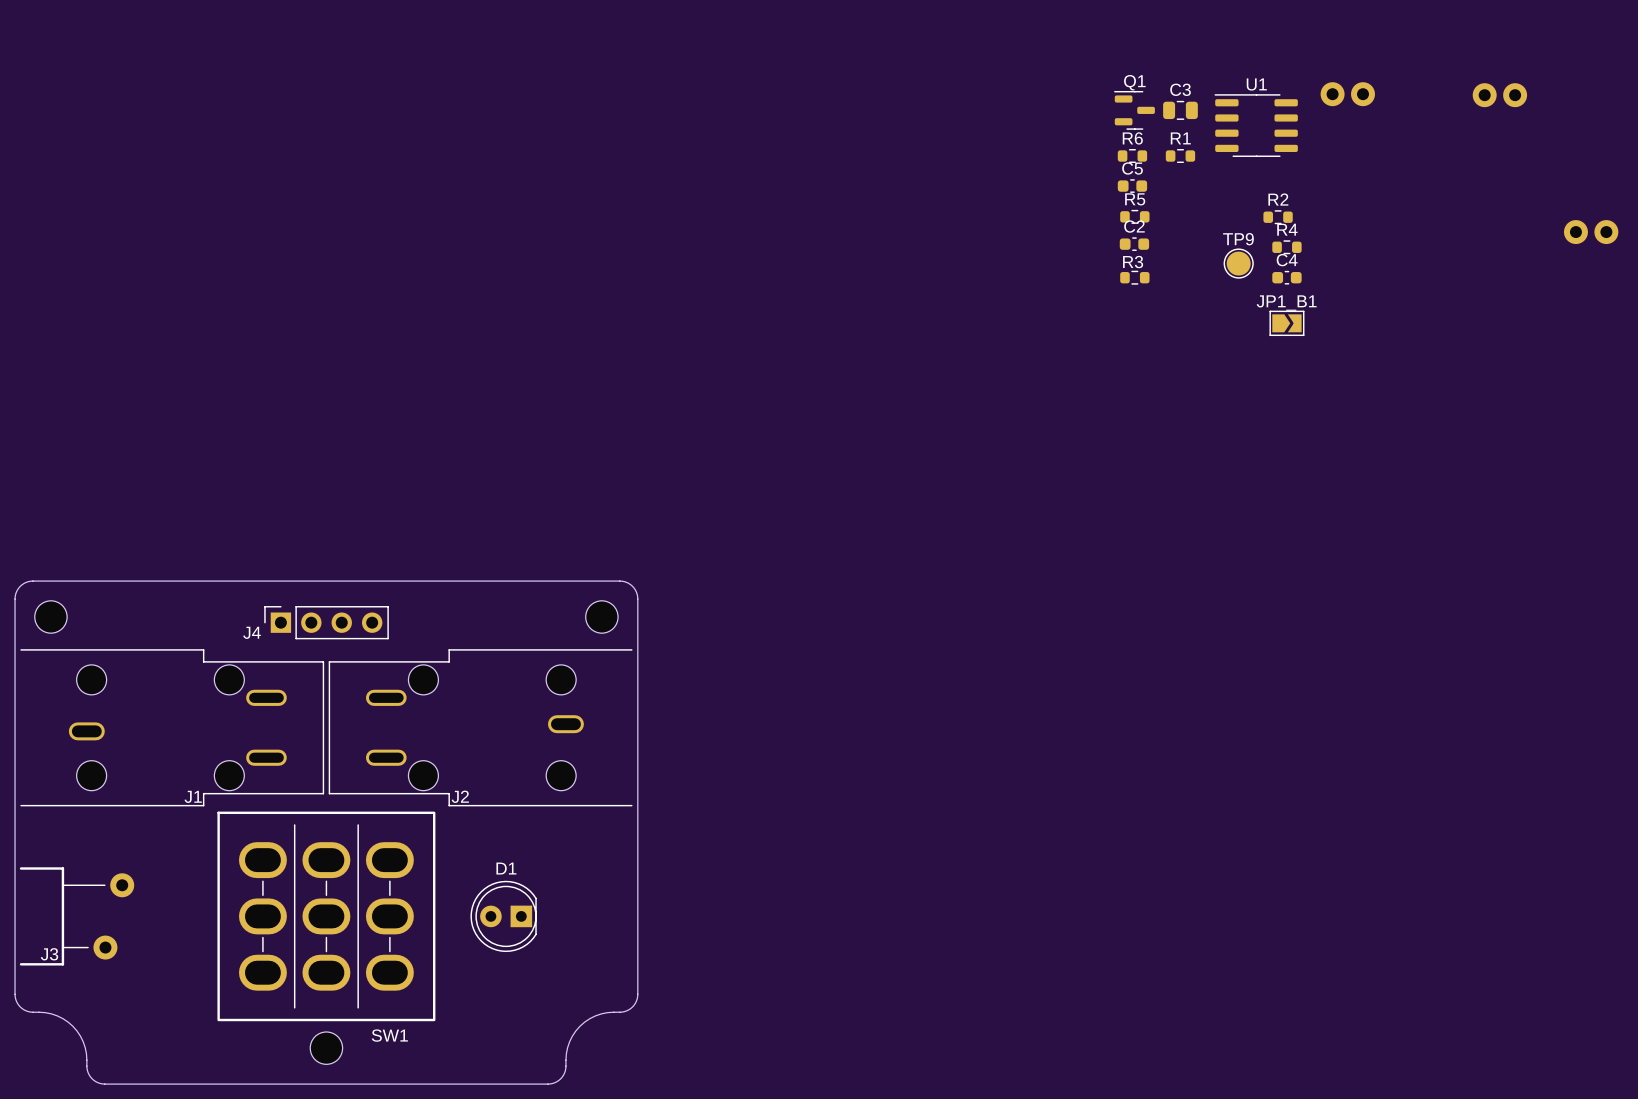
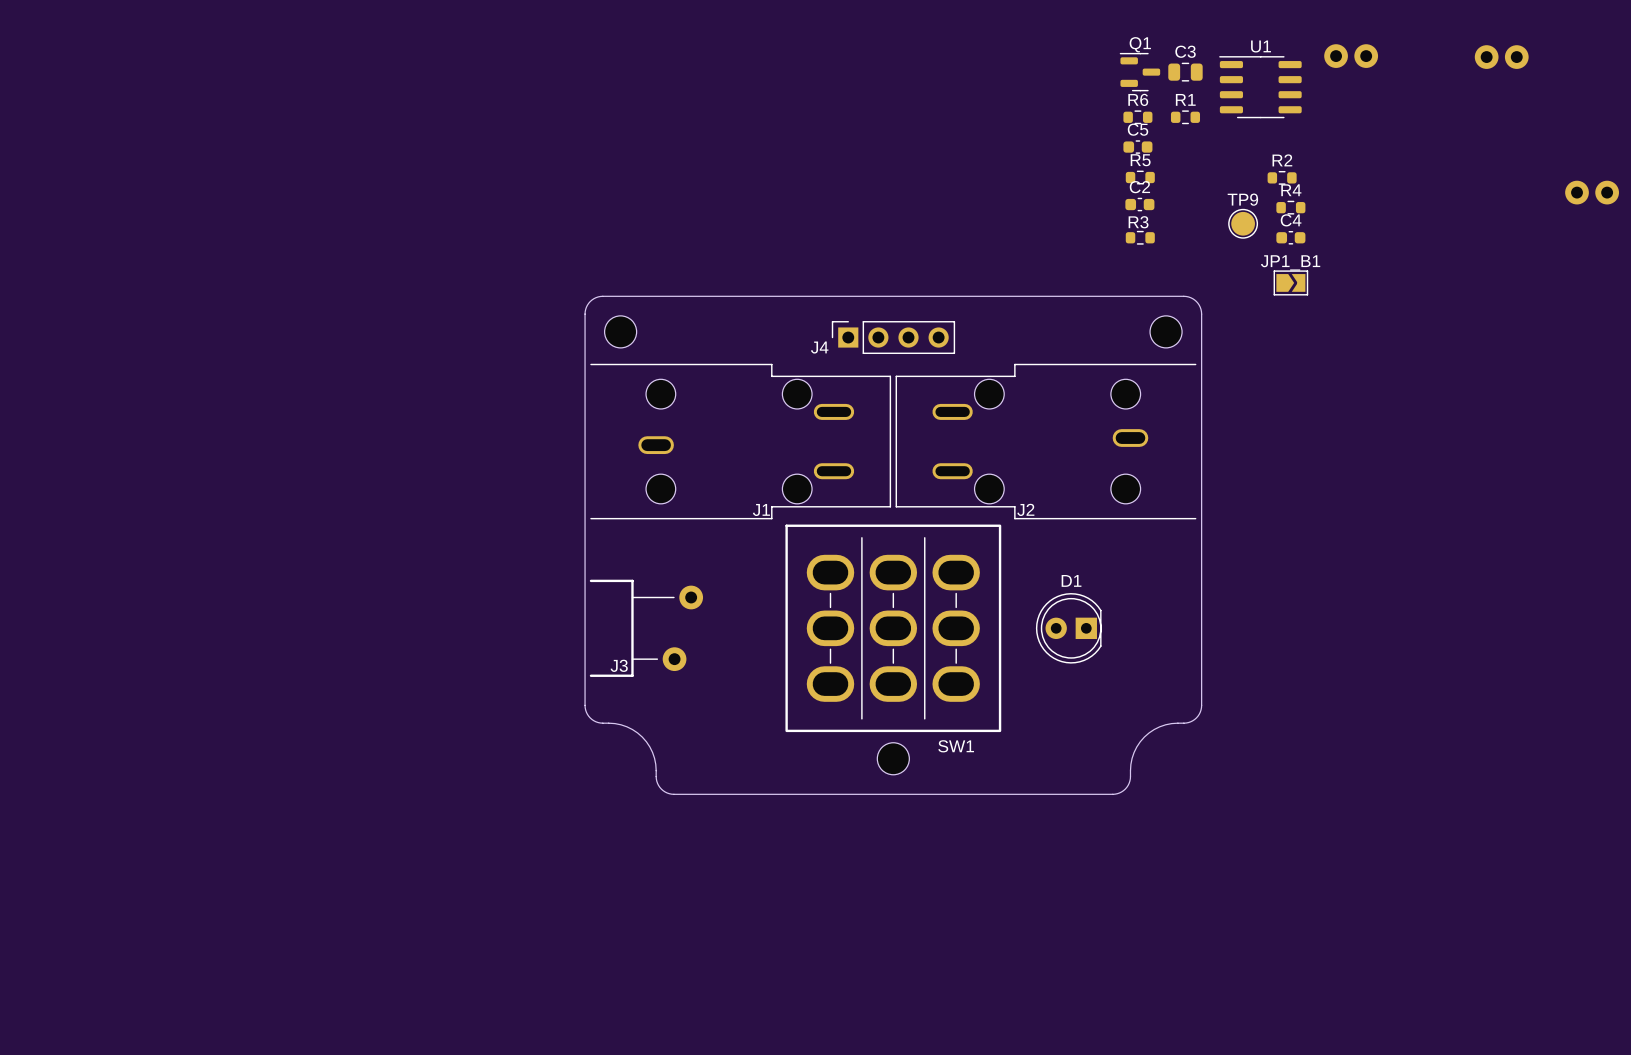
board edge: none -> (602, 296) (1183, 296) (1194, 299) (1199, 305) (1201, 314) (1201, 705) (1197, 716) (1188, 722) (1159, 726) (1144, 737) (1136, 746) (1132, 758) (1128, 785) (1121, 791) (1115, 794) (673, 794) (663, 790) (656, 781) (652, 752) (642, 737) (632, 729) (621, 724) (593, 720) (587, 714) (585, 707) (585, 314) (590, 301) (602, 296)
part: none -> (620, 331)
part: none -> (1166, 331)
line: none -> (590, 364) (771, 364) (771, 376) (890, 376) (890, 506) (771, 506) (771, 518) (590, 518)
line: none -> (1195, 364) (1014, 364) (1014, 376) (896, 376) (896, 506) (1014, 506) (1014, 518) (1195, 518)
board edge: (32, 581) (619, 581) (630, 584) (635, 590) (637, 599) (637, 994) (634, 1005) (624, 1011) (595, 1015) (579, 1026) (572, 1036) (567, 1047) (563, 1075) (556, 1081) (550, 1083) (104, 1084) (93, 1080) (87, 1070) (83, 1041) (72, 1026) (62, 1018) (51, 1013) (24, 1009) (17, 1003) (15, 996) (15, 599) (20, 586) (32, 581) -> none
part: (50, 616) -> none
part: (601, 616) -> none
J4 position: (326, 622) -> (893, 337)
line: none -> (590, 580) (632, 580) (632, 675) (590, 675)
line: none -> (632, 597) (673, 597)
drawing: none -> [1040, 597, 1102, 659]
line: (21, 649) (203, 649) (203, 661) (323, 661) (323, 793) (203, 793) (203, 805) (21, 805) -> none
line: (631, 649) (449, 649) (449, 661) (329, 661) (329, 793) (449, 793) (449, 805) (631, 805) -> none
line: none -> (1100, 610) (1100, 646) (1088, 658) (1075, 662) (1061, 661) (1049, 655) (1041, 645) (1036, 632) (1037, 619) (1043, 607) (1053, 598) (1066, 594) (1079, 594) (1091, 600) (1100, 610)
line: none -> (632, 659) (657, 659)
J1 position: (177, 727) -> (746, 441)
J2 position: (474, 727) -> (1040, 441)
part: none -> (893, 758)
line: (21, 868) (62, 868) (62, 964) (21, 964) -> none
line: (62, 885) (104, 885) -> none
drawing: [475, 885, 537, 948] -> none
line: (536, 898) (536, 934) (523, 946) (510, 951) (496, 950) (484, 943) (475, 933) (471, 920) (472, 907) (478, 895) (488, 886) (501, 881) (514, 882) (526, 888) (536, 898) -> none
J3 position: (113, 916) -> (682, 628)
SW1 position: (326, 916) -> (893, 628)
D1 position: (506, 916) -> (1071, 628)
line: (62, 947) (88, 947) -> none
part: (326, 1048) -> none

